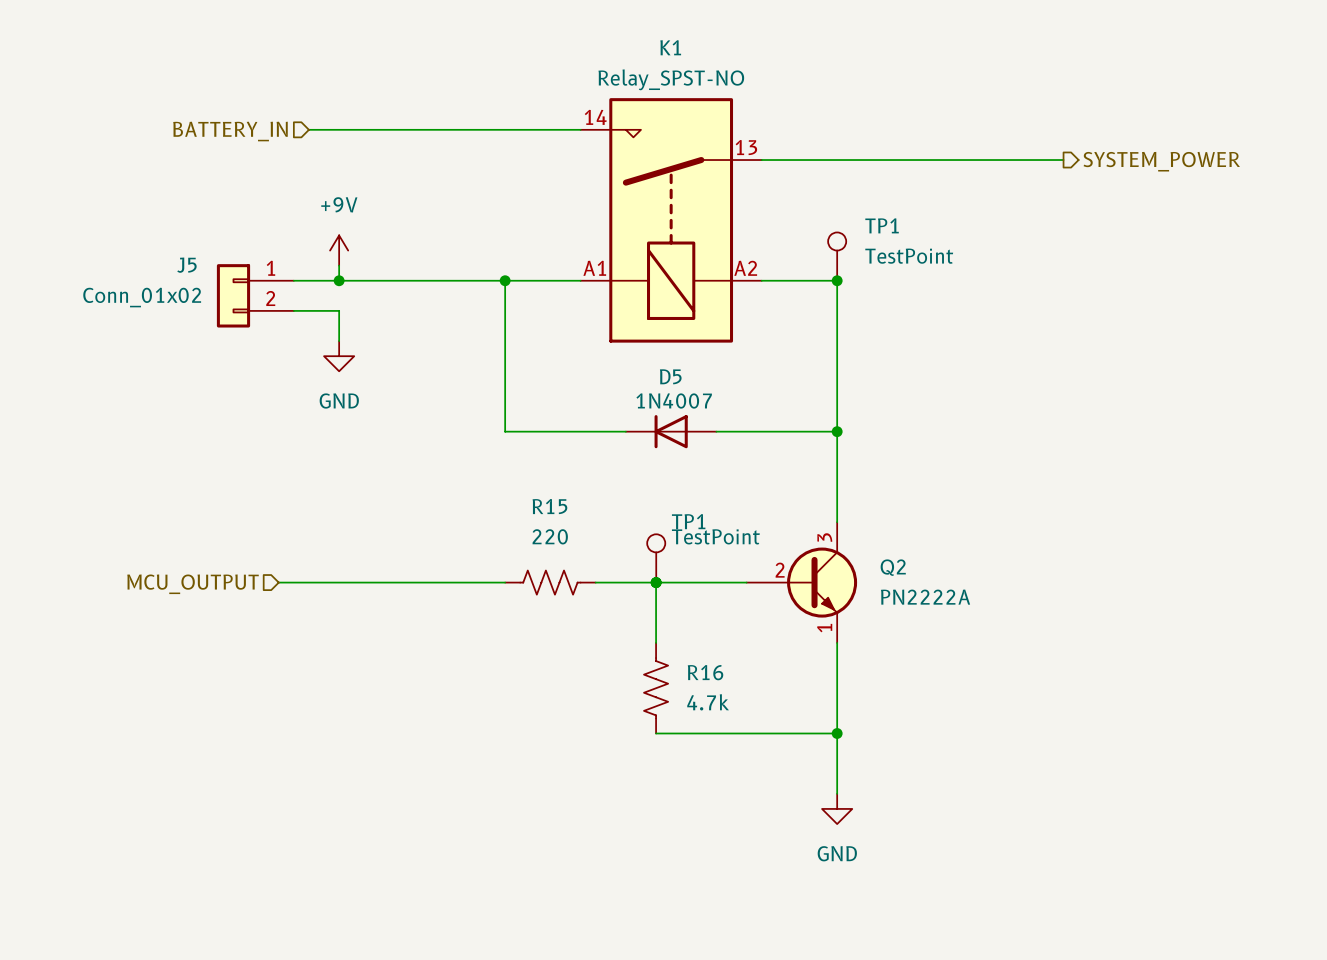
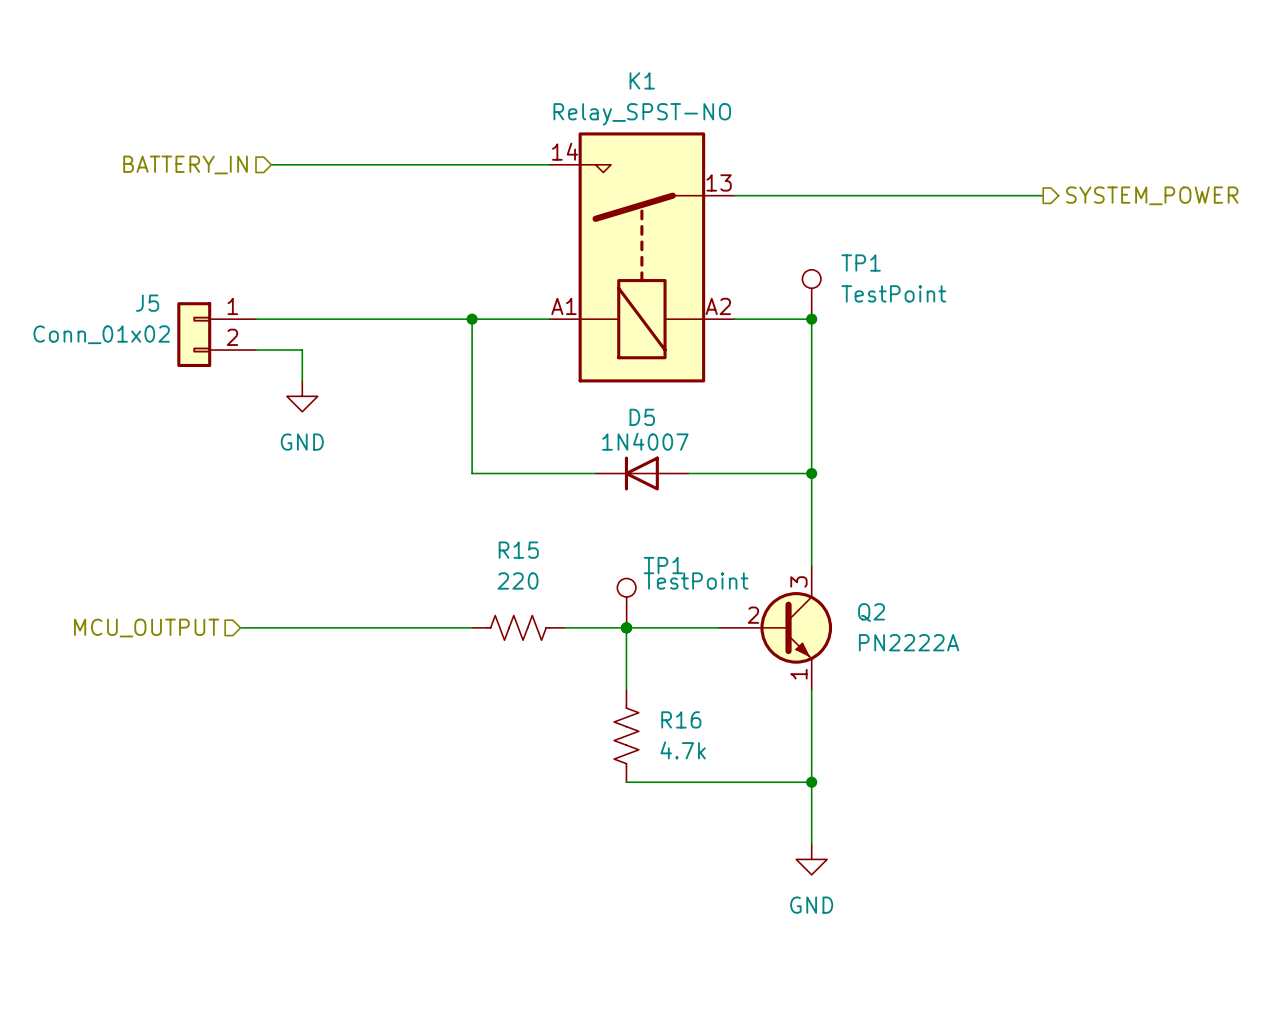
power symbol: +9V (339, 250) -> none
wire: (339, 265) (339, 280) -> none
junction: (339, 280) -> none

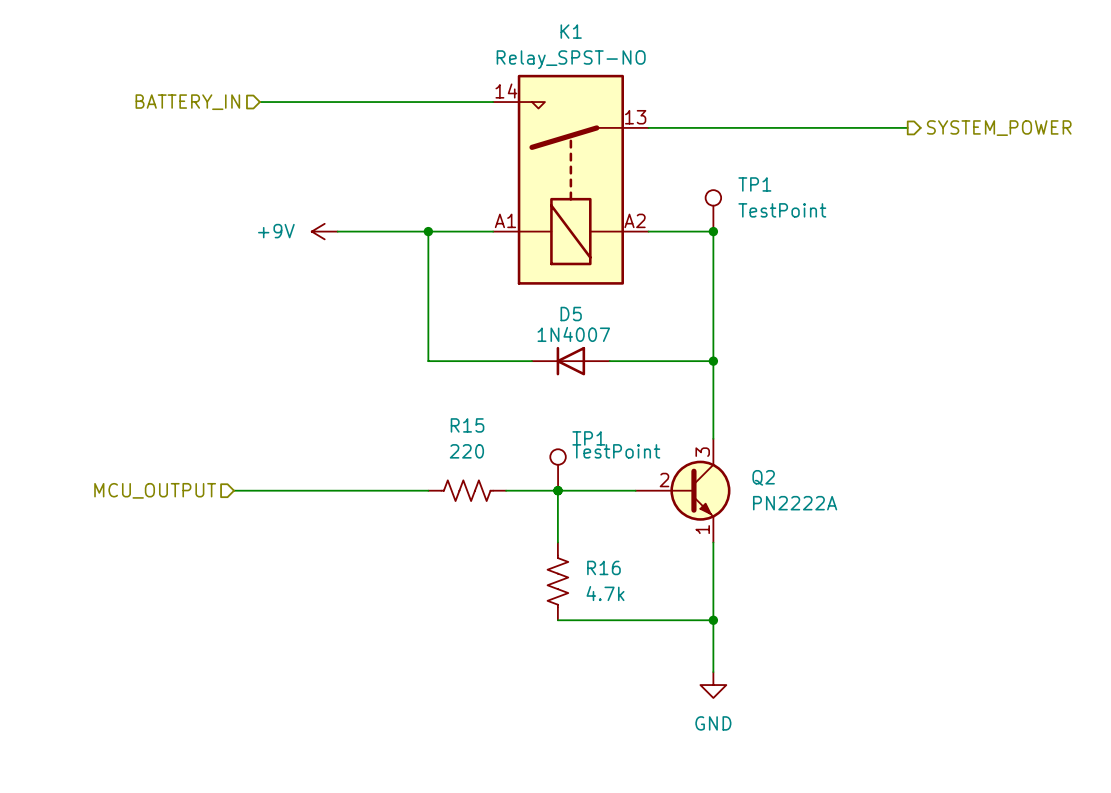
wire: (256, 319) (364, 319) -> none
power symbol: none -> +9V (324, 231)
J5: Conn_01x02 (216, 334) -> none
wire: (256, 350) (302, 350) (302, 380) -> none
power symbol: GND (302, 396) -> none

